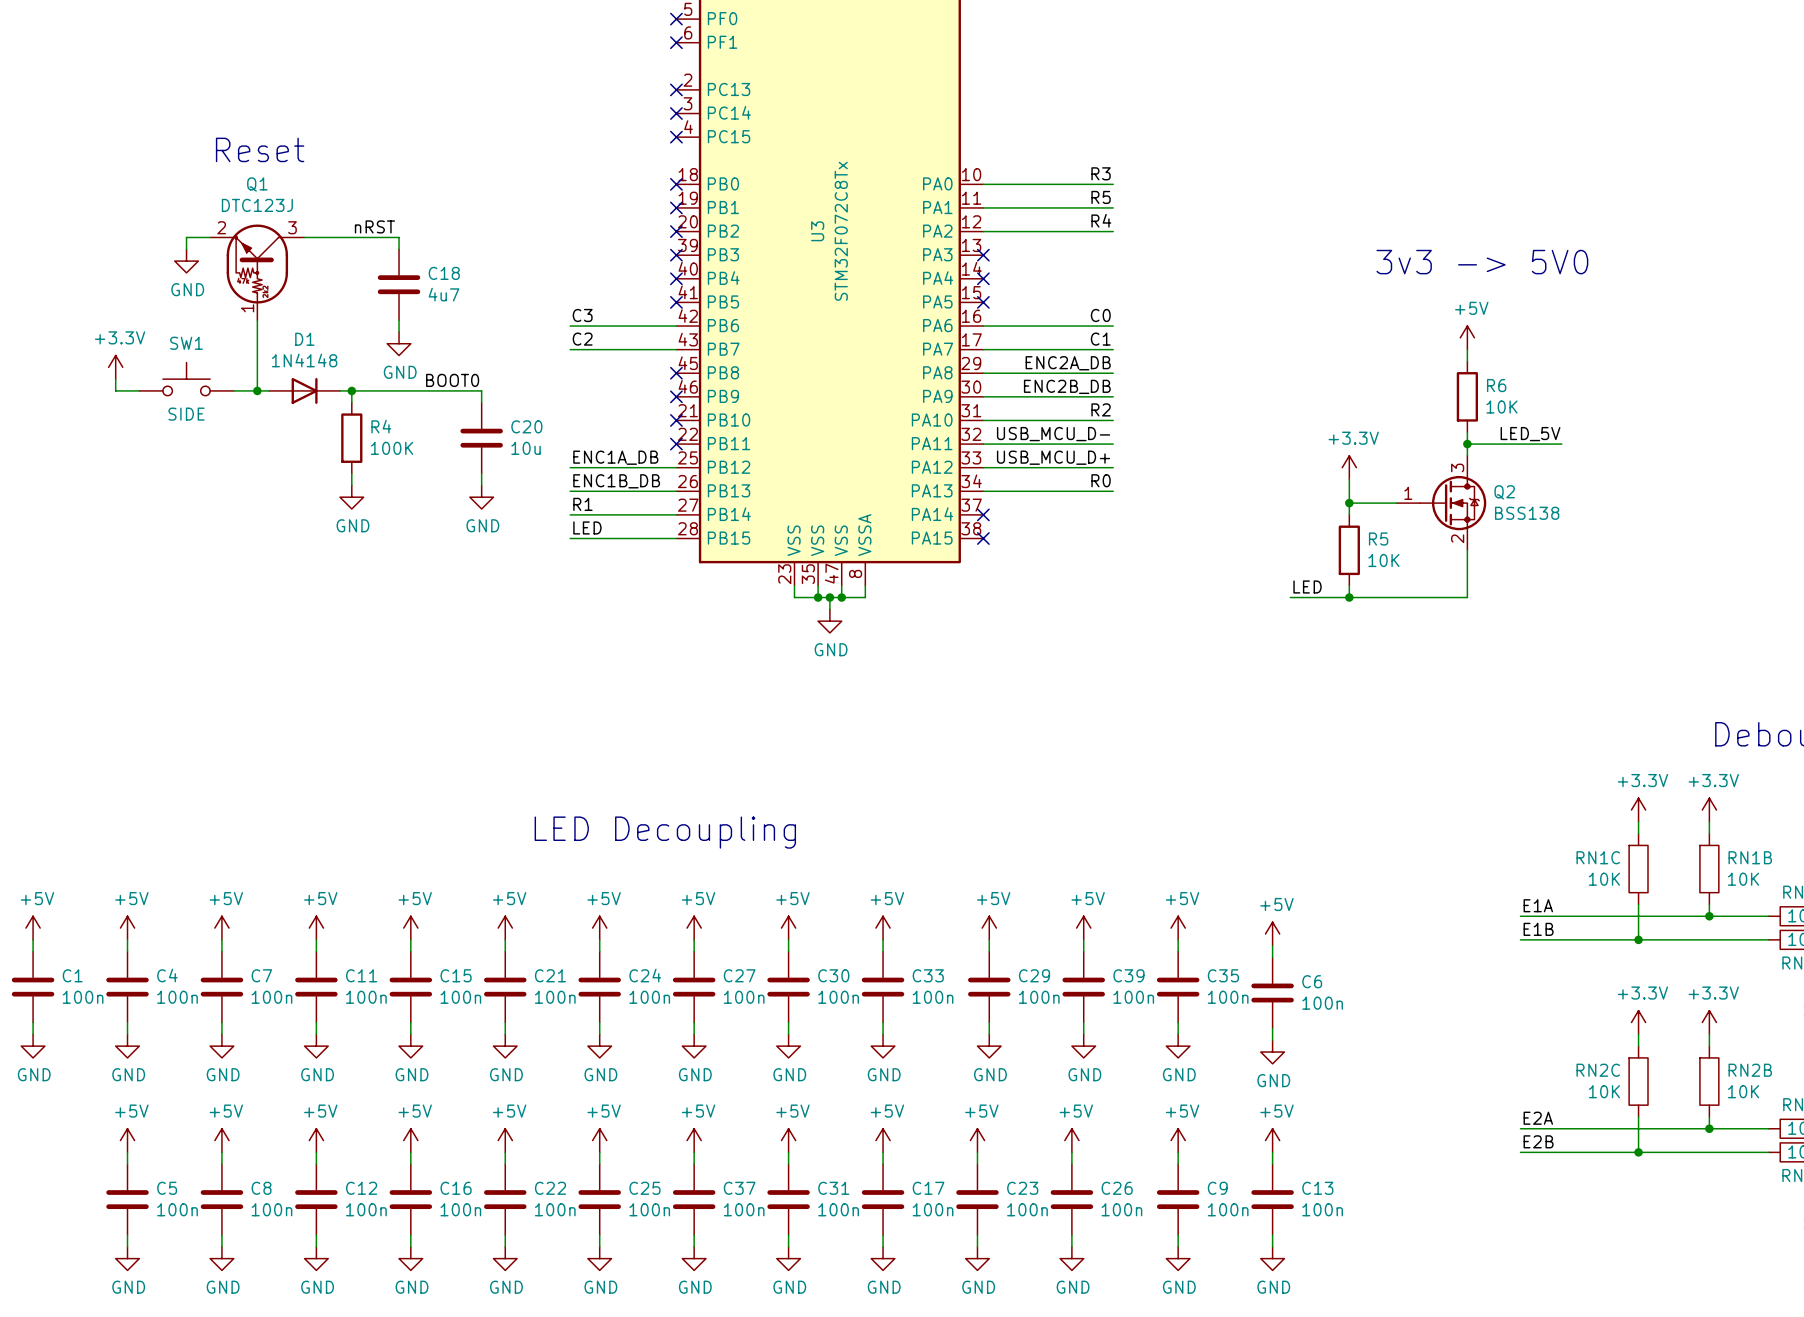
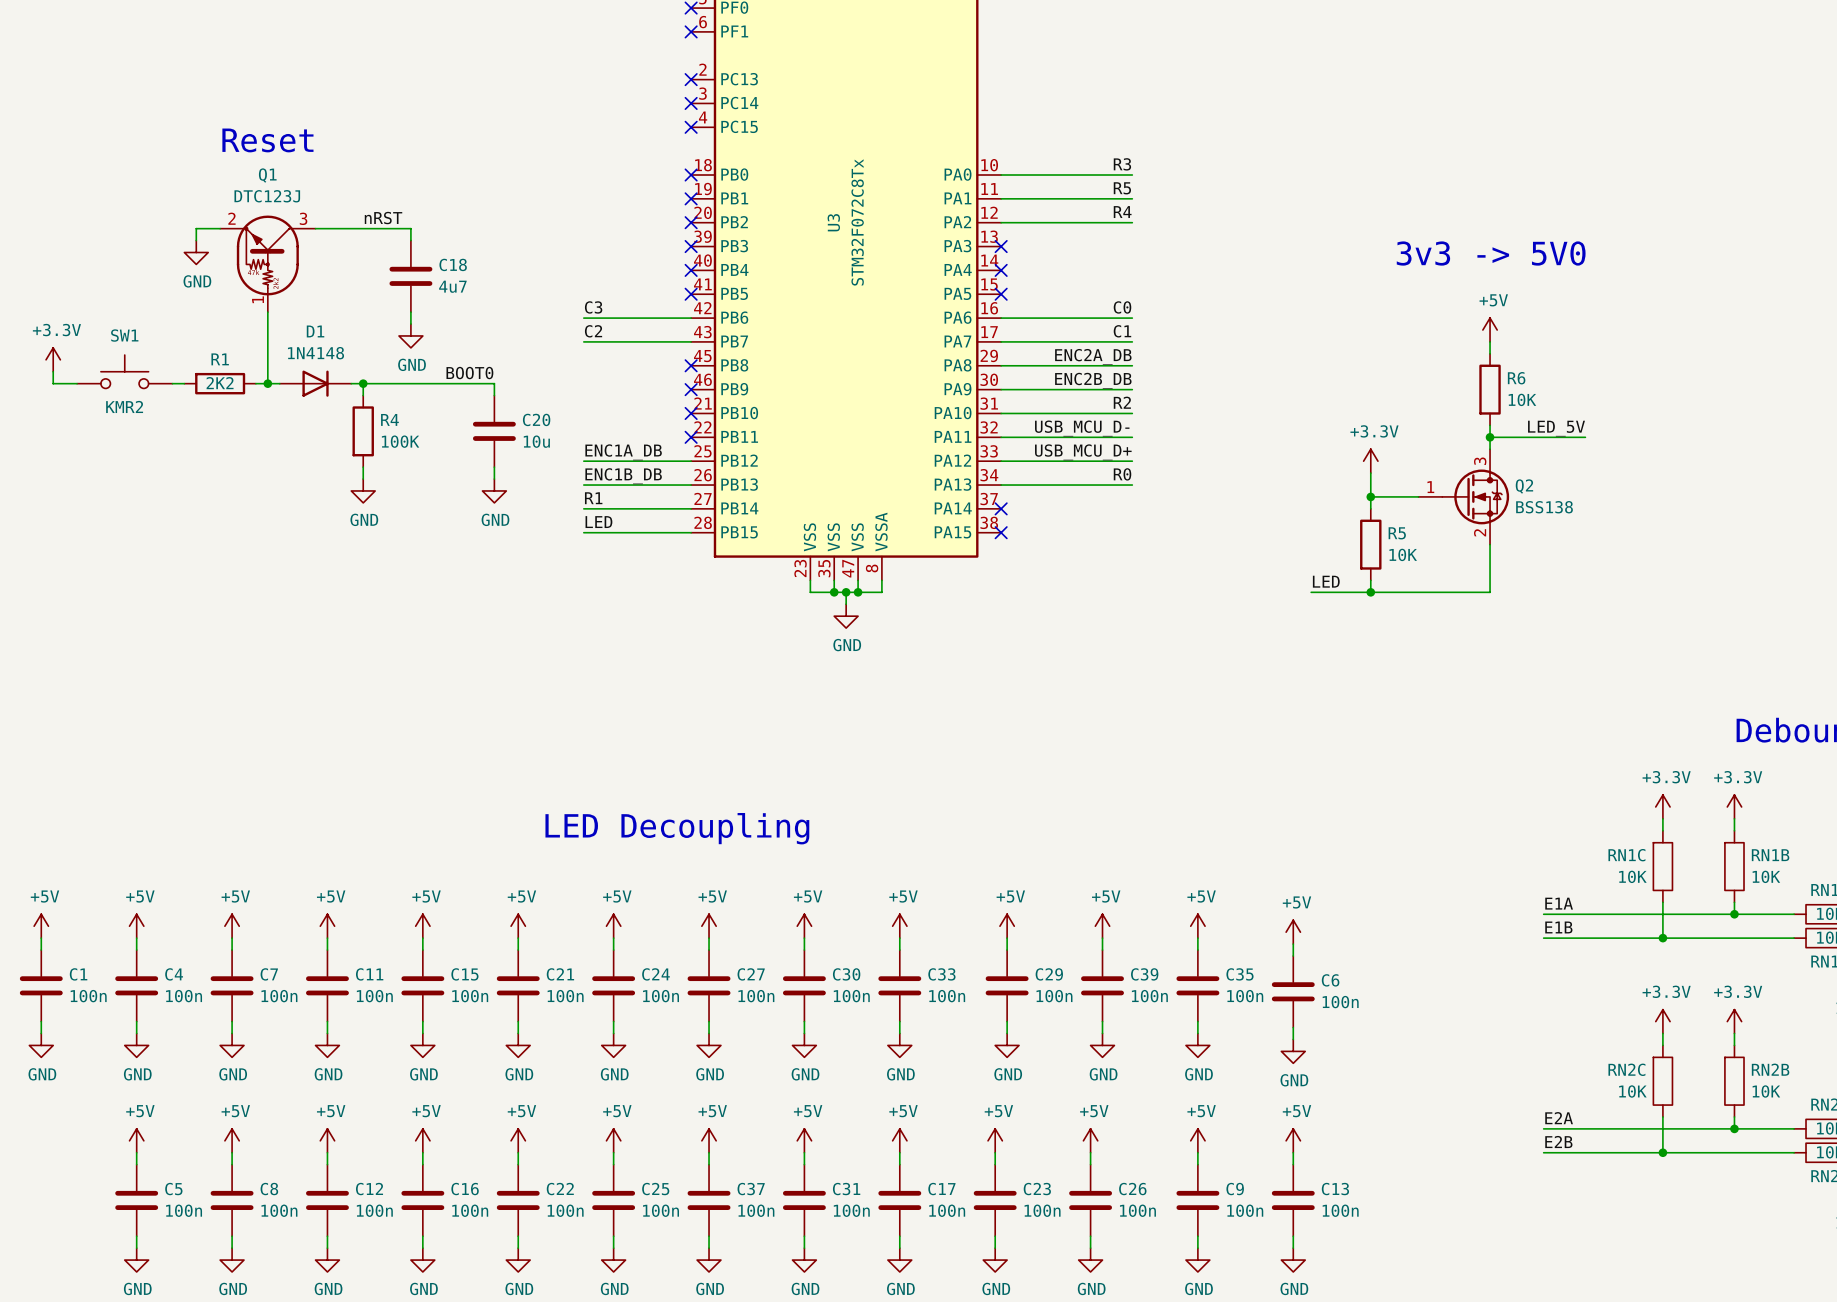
power symbol position: +3.3V (115, 367) -> +3.3V (53, 359)
wire: (115, 379) (115, 390) (139, 390) -> (53, 371) (53, 383) (77, 383)
SW1 position: (186, 379) -> (124, 371)
R1: none -> 2K2 (220, 383)
SW1 value: SIDE (186, 414) -> KMR2 (124, 406)

